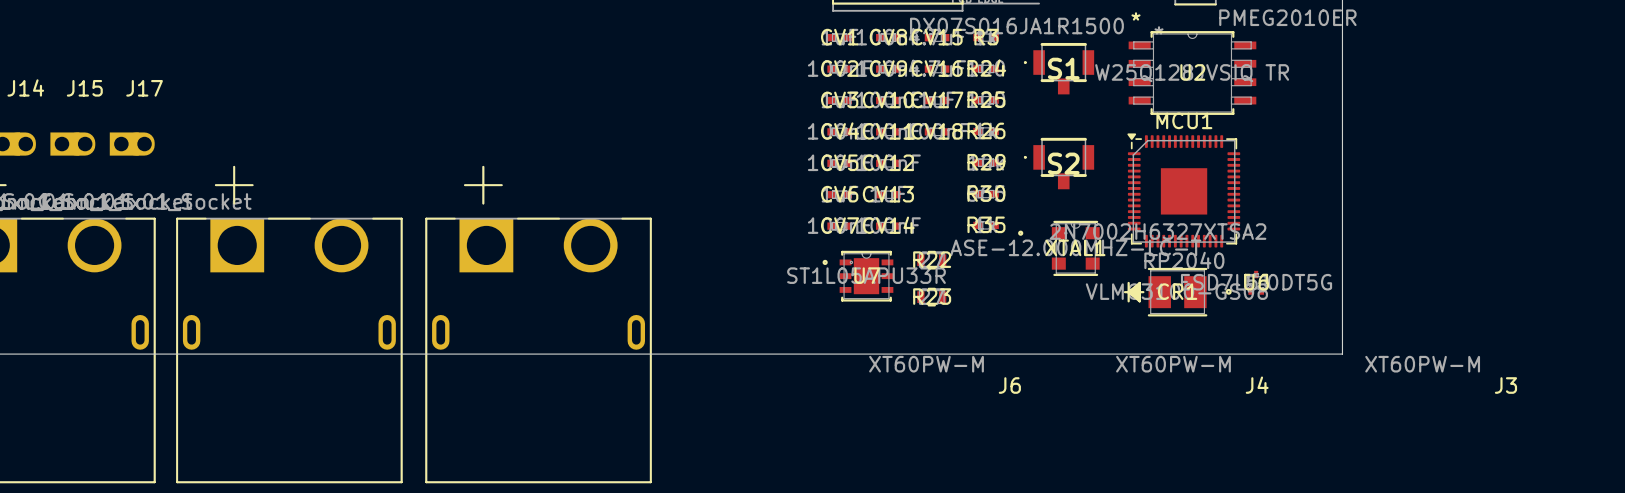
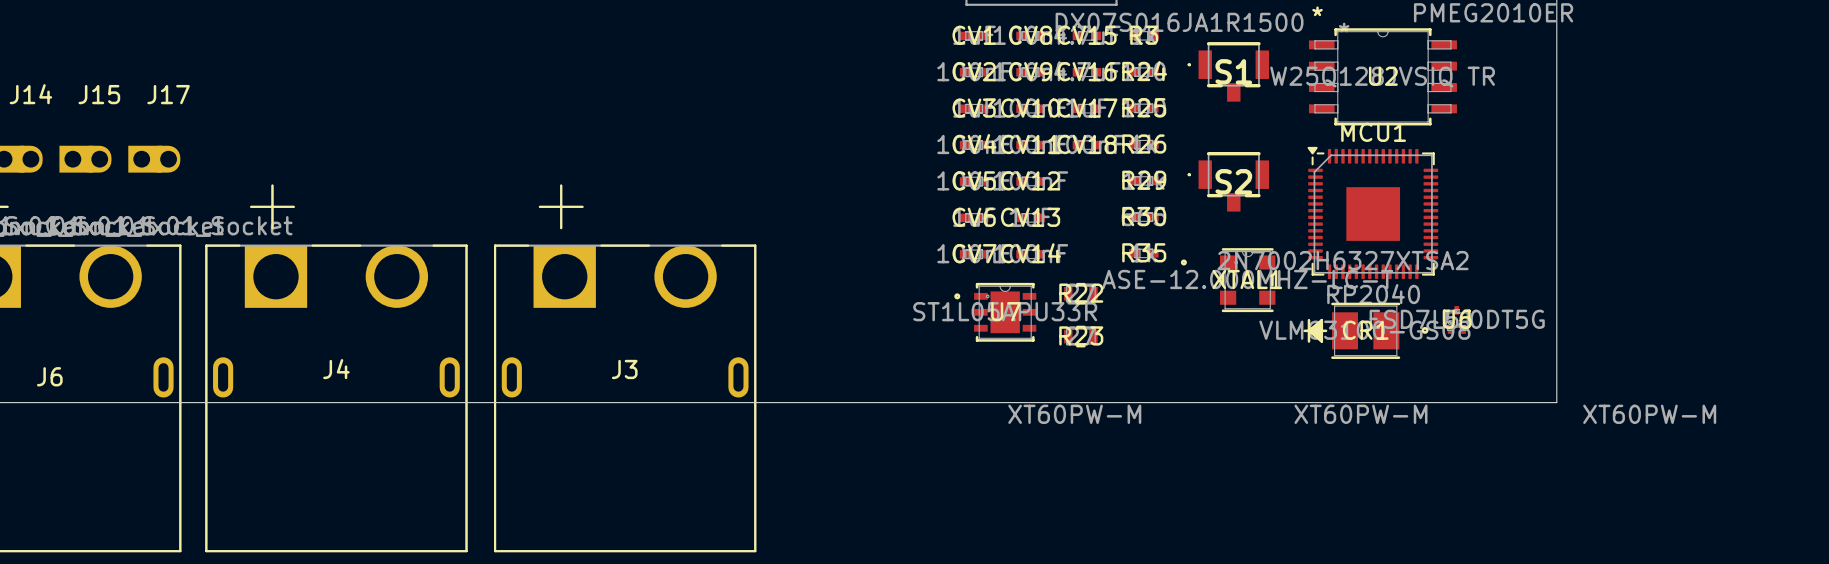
J6 name position: J6 (1009, 385) -> J6 (49, 376)
J4 name position: J4 (1257, 385) -> J4 (336, 369)
J3 name position: J3 (1505, 385) -> J3 (624, 369)

